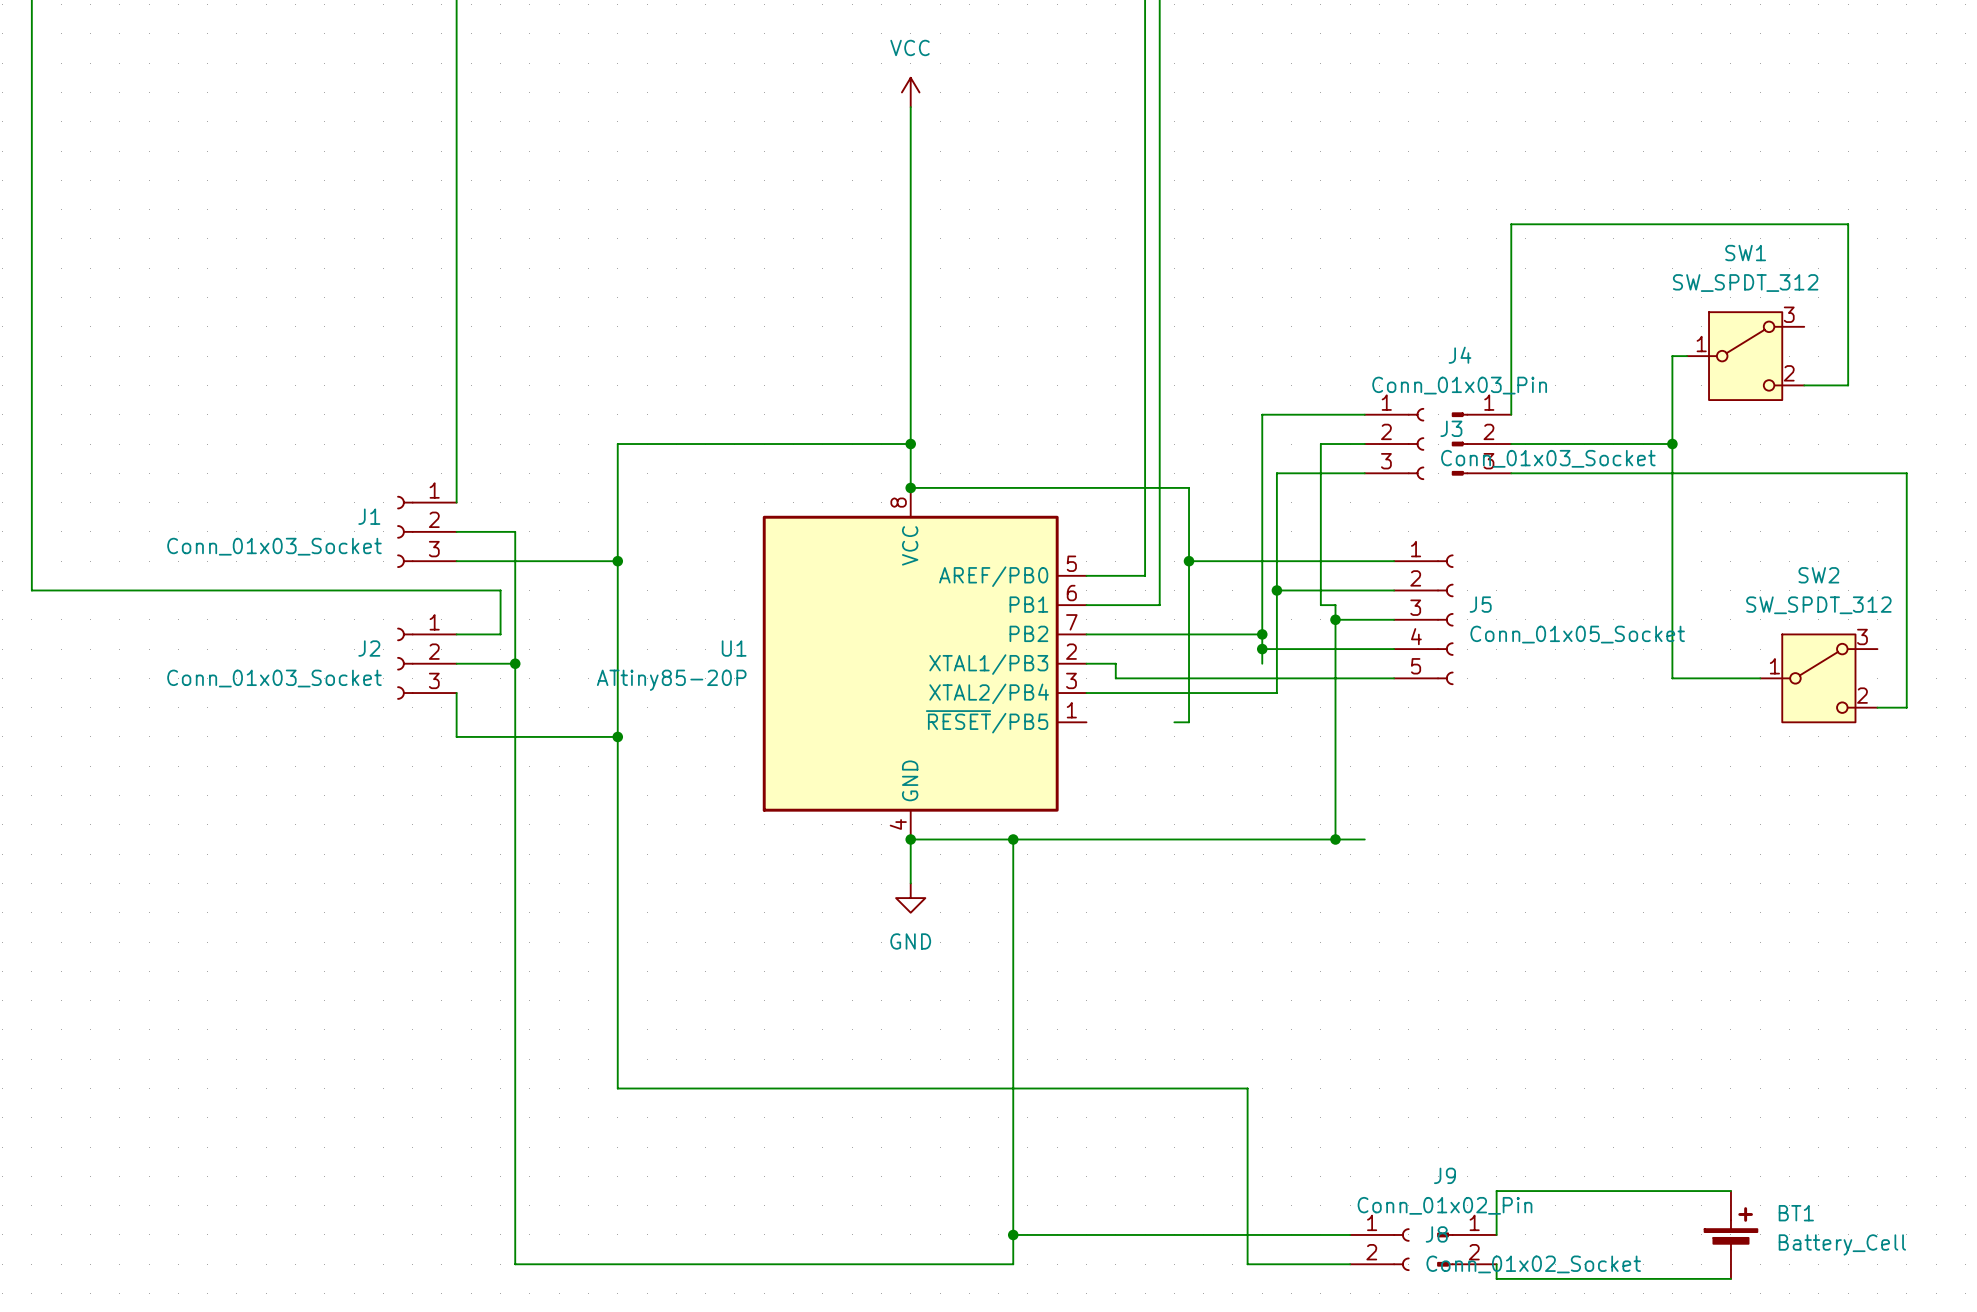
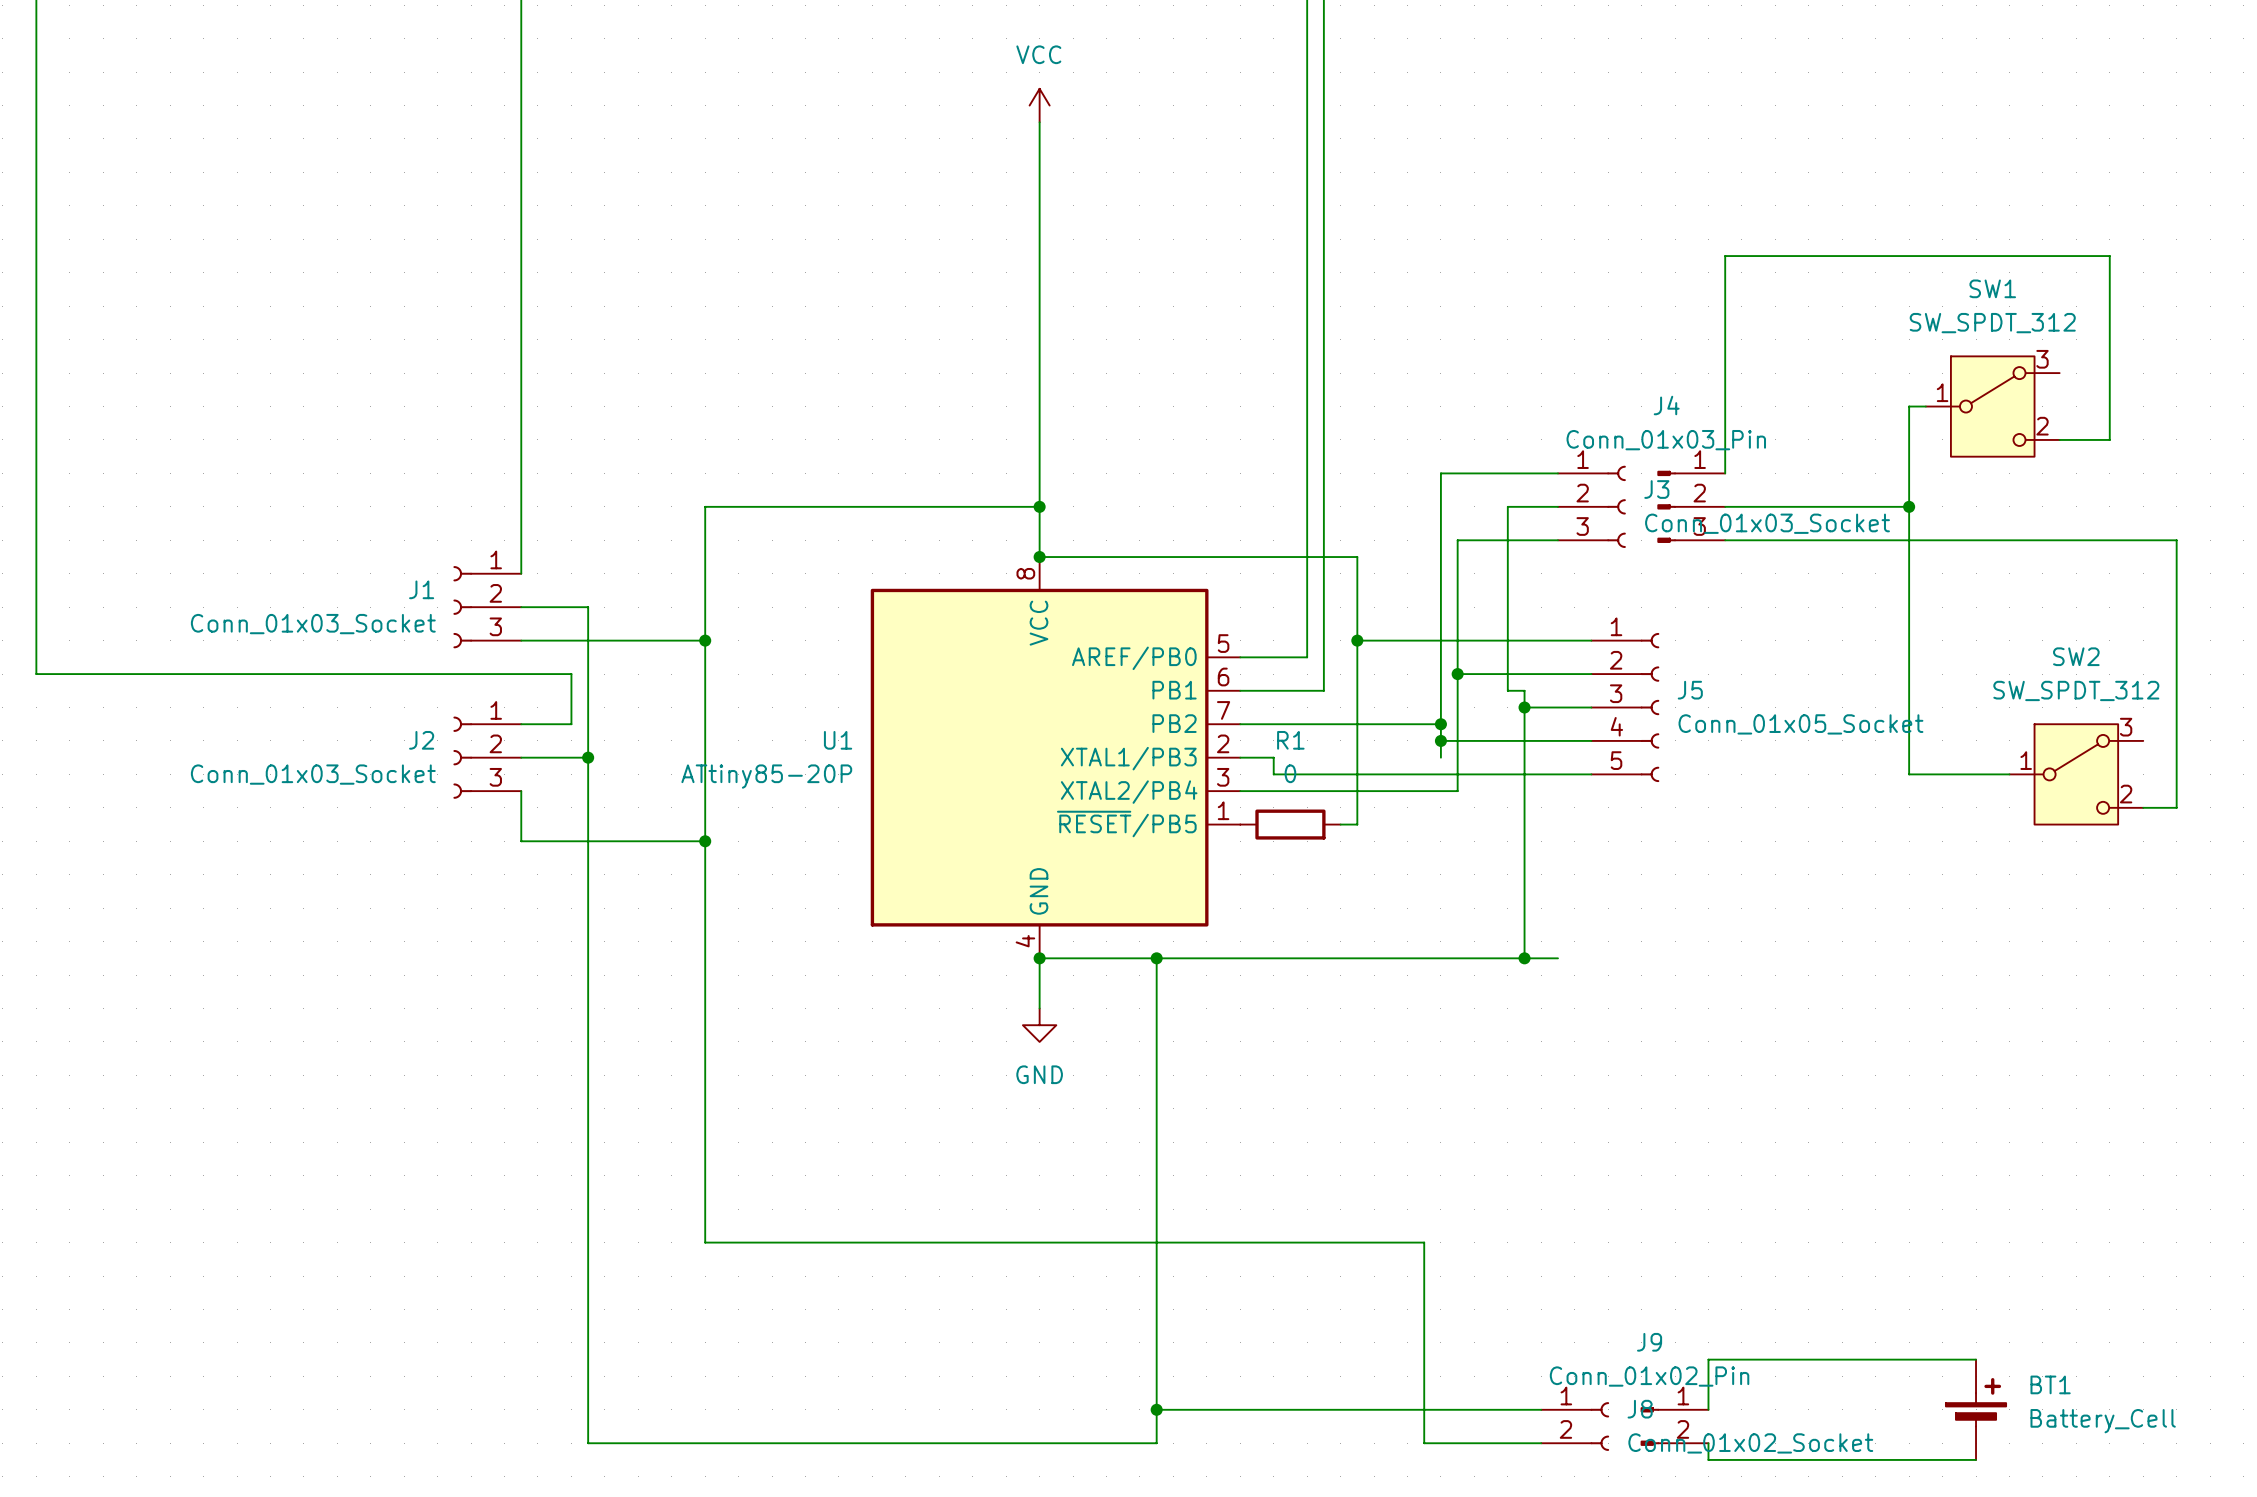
R1: none -> 0 (1290, 824)

